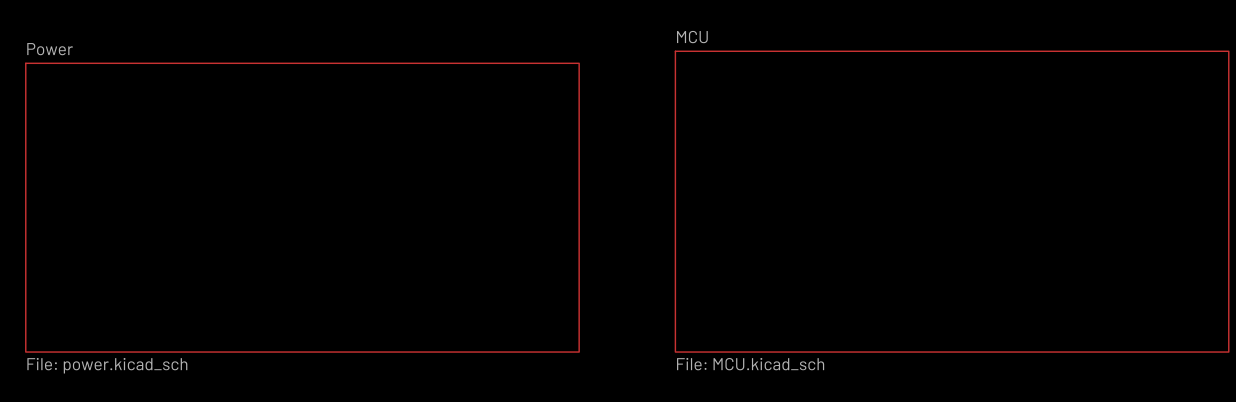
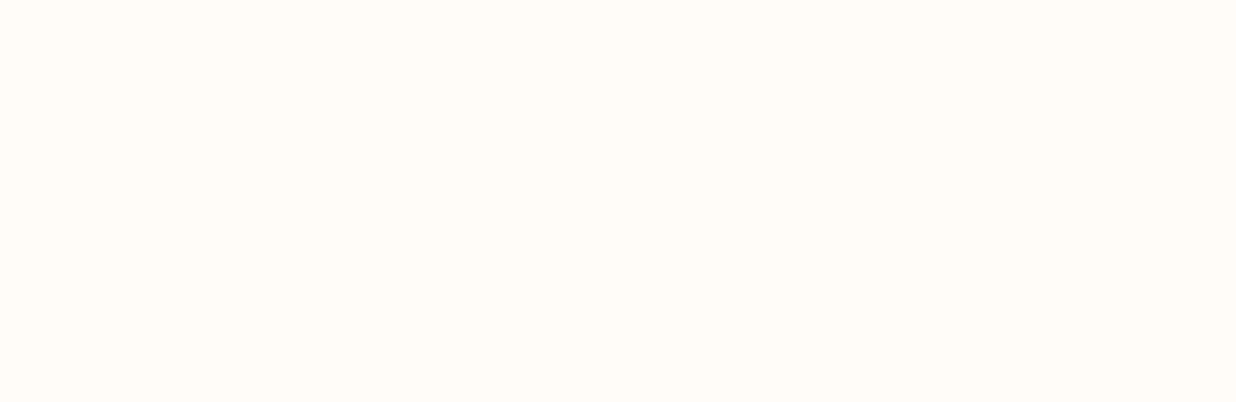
sheet MCU: File: MCU.kicad_sch (952, 201) -> none
sheet Power: File: power.kicad_sch (302, 207) -> none

